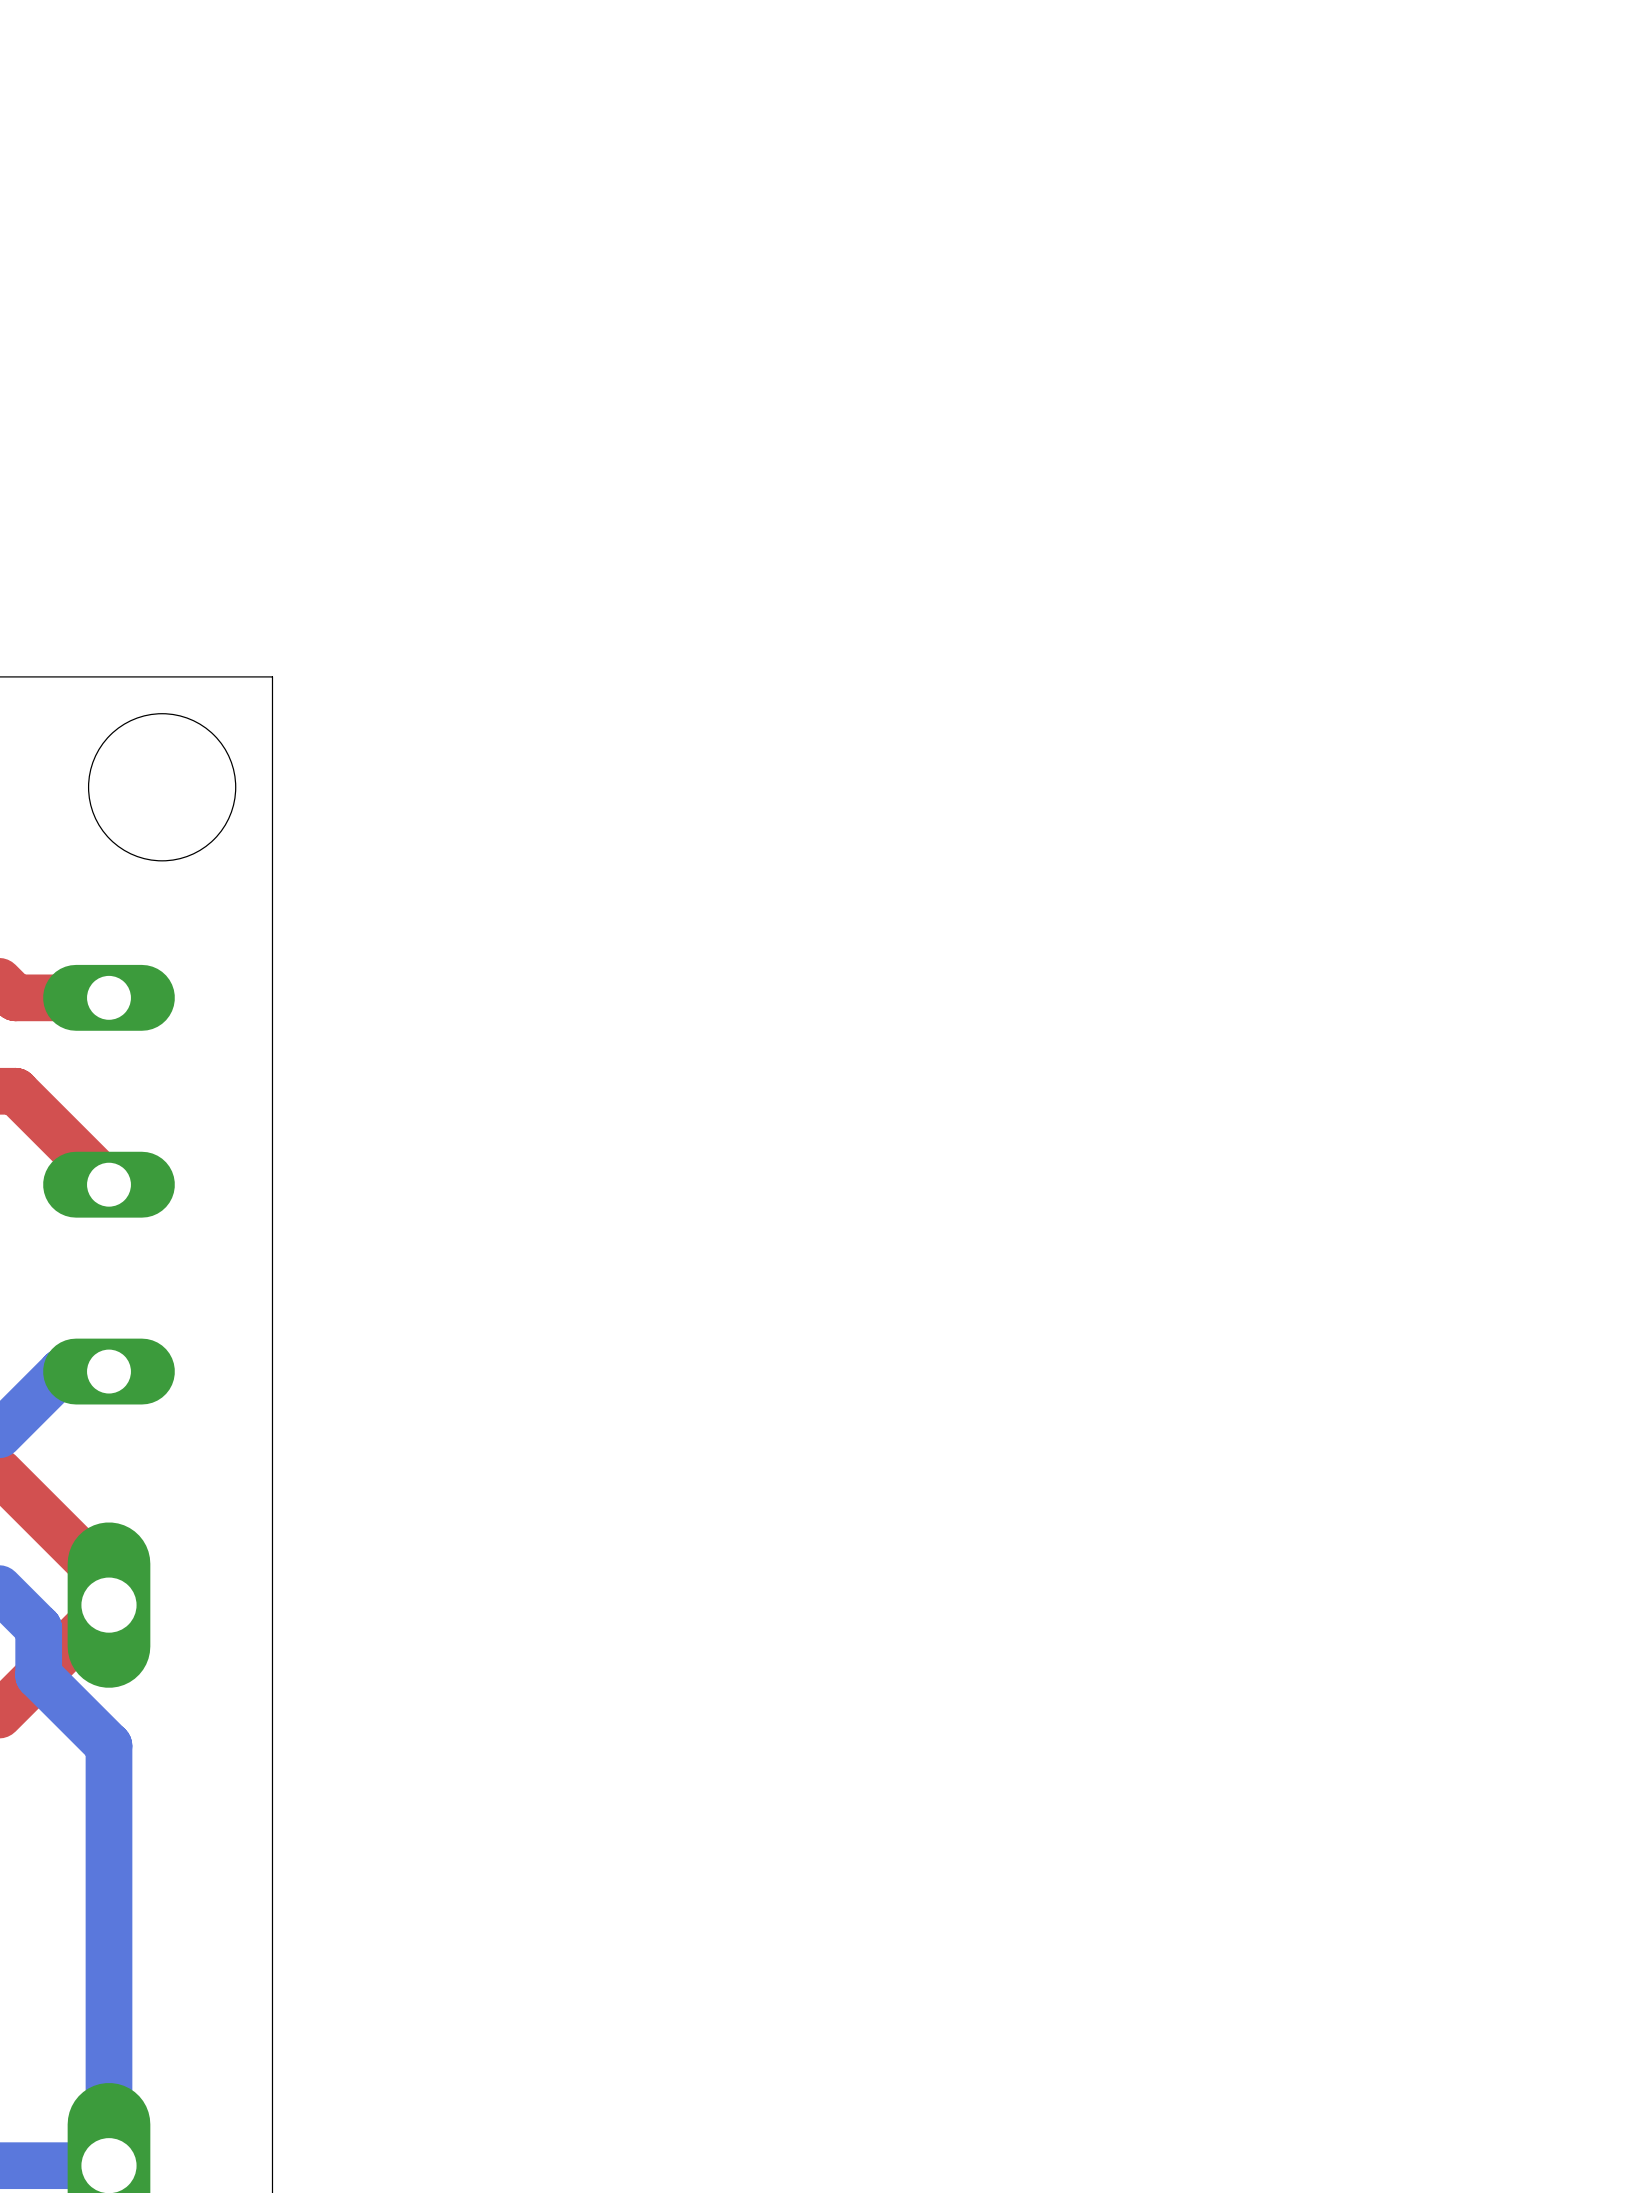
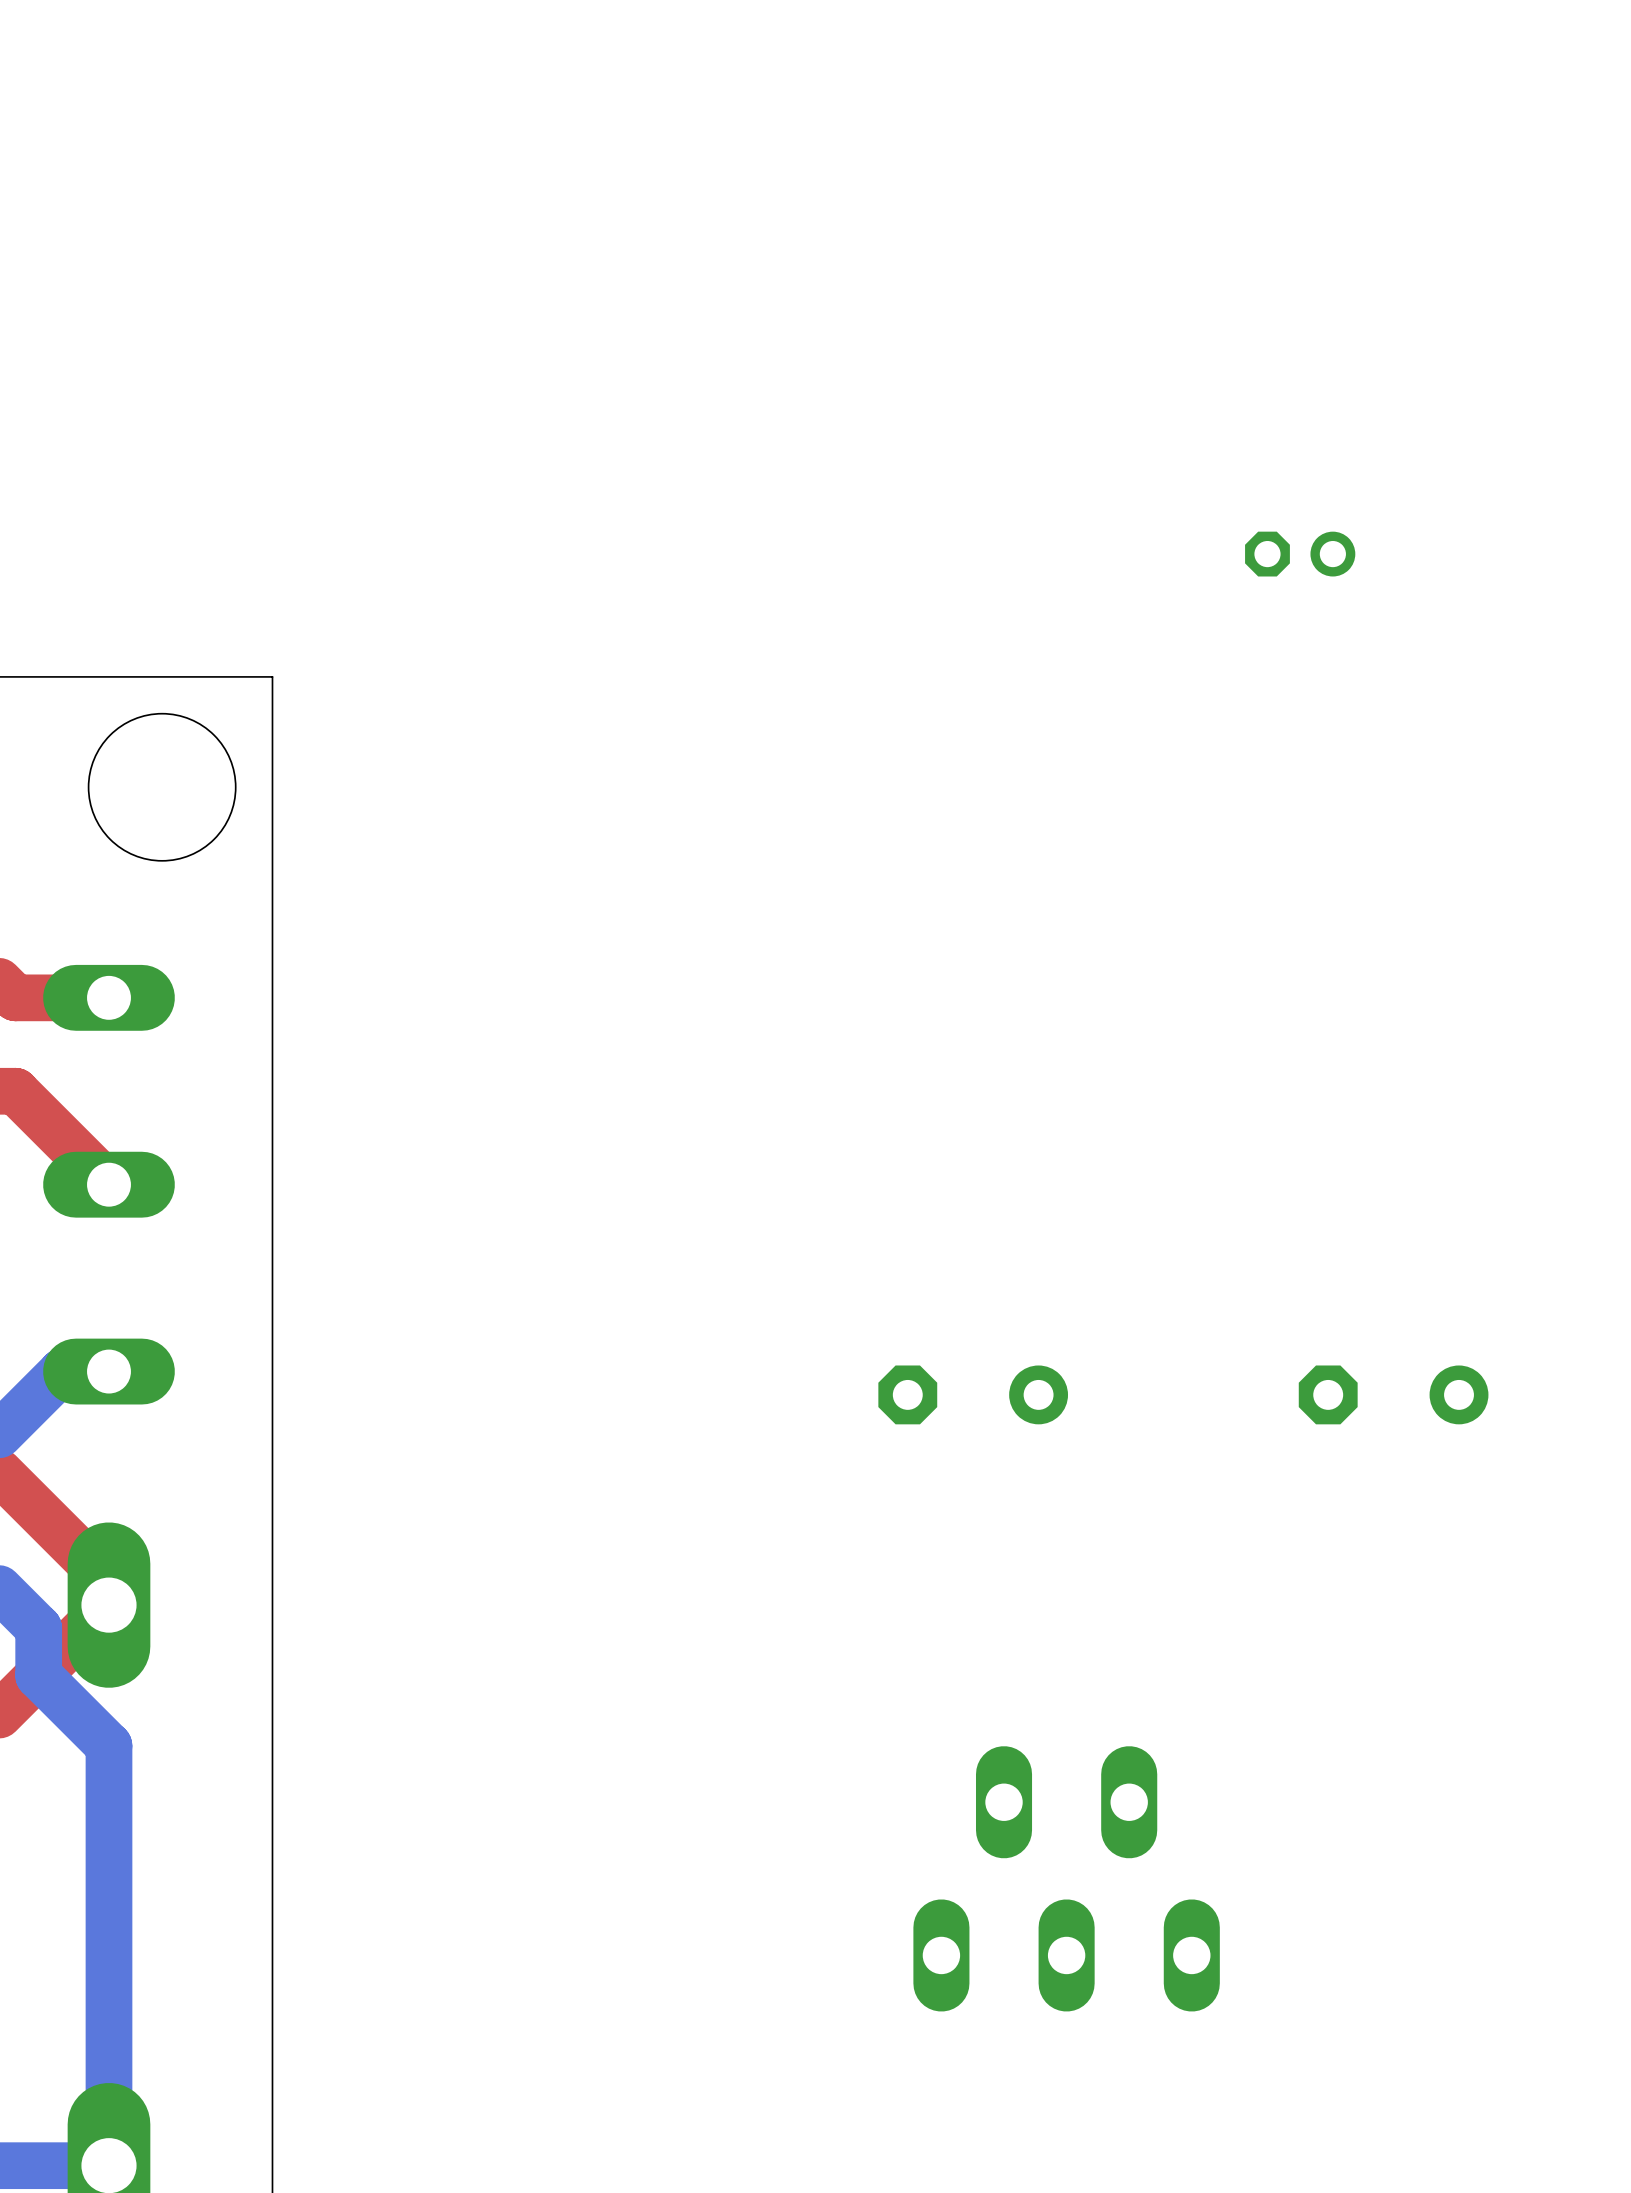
part: none -> (1300, 554)
part: none -> (973, 1394)
part: none -> (1393, 1394)
part: none -> (1066, 1878)

